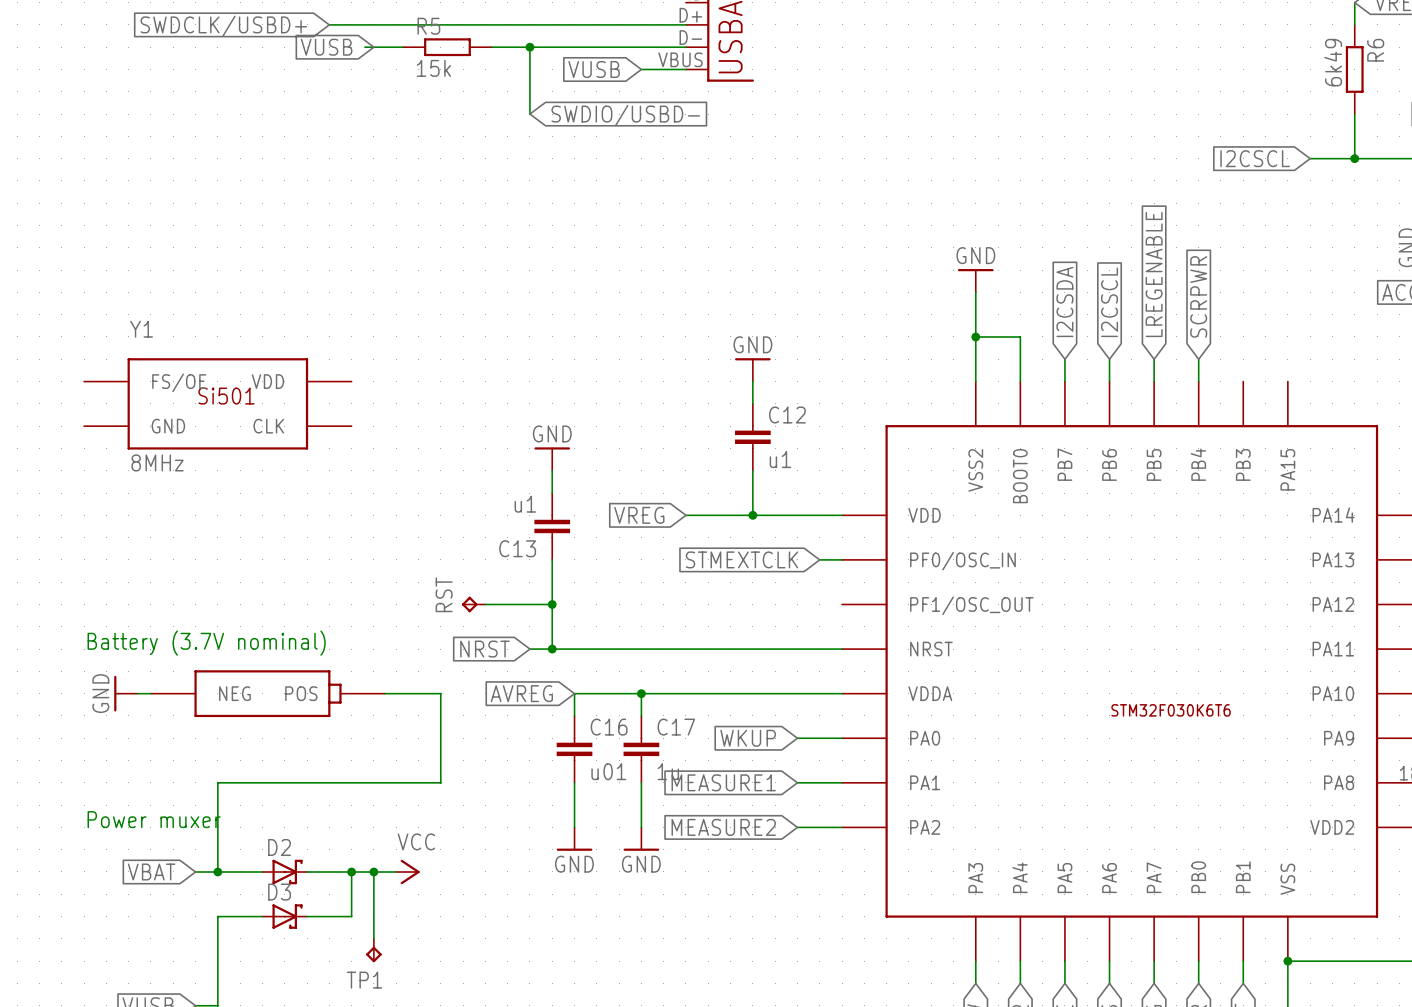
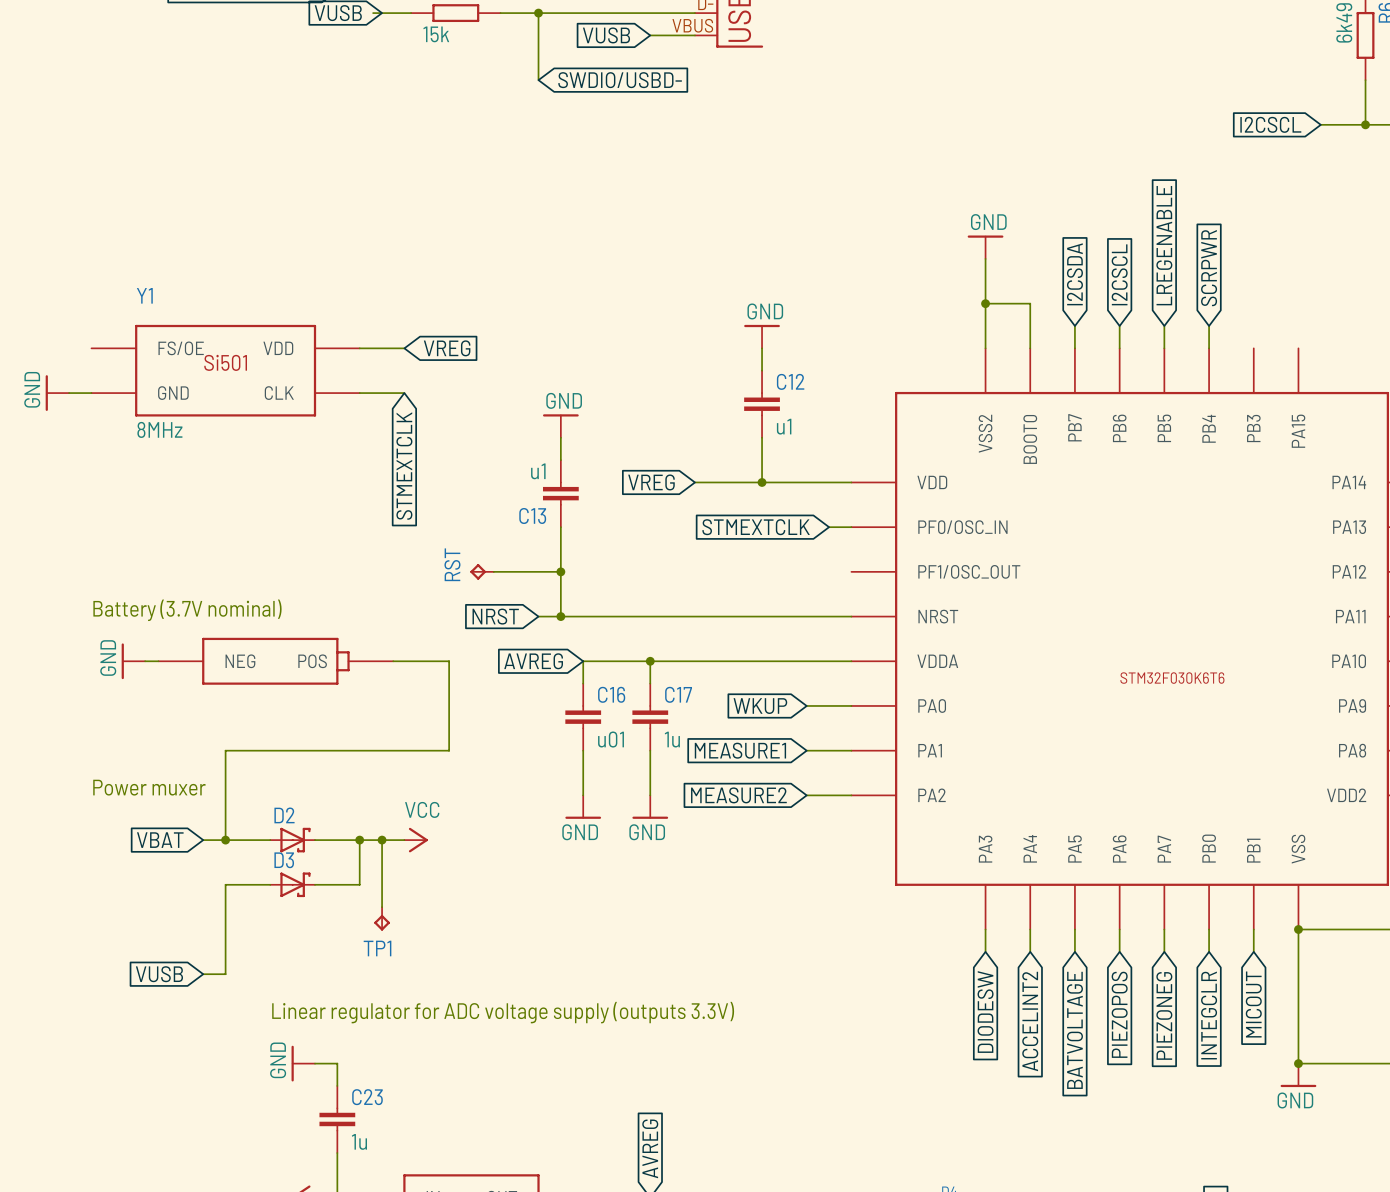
wire: none -> (359, 348) (404, 348)
global label: none -> VREG (447, 348)
power symbol: none -> GND (57, 393)
wire: none -> (69, 393) (91, 393)
wire: none -> (359, 393) (404, 393)
global label: none -> STMEXTCLK (404, 466)

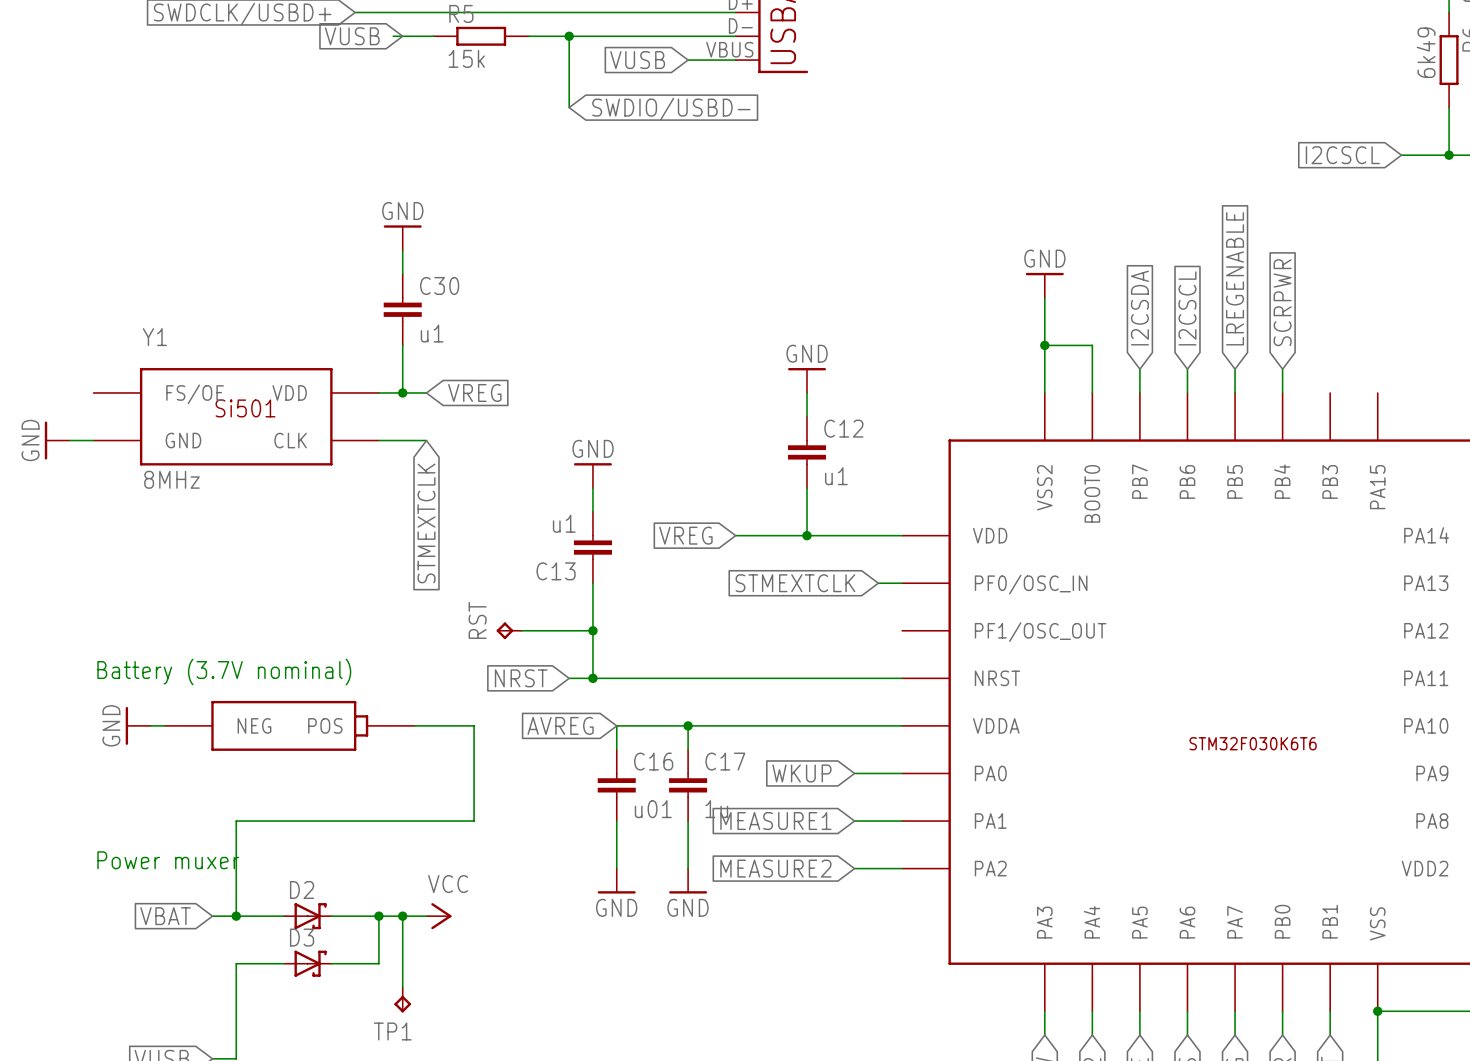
power symbol: none -> GND (402, 237)
wire: none -> (402, 250) (402, 274)
C30: none -> u1 (402, 309)
wire: none -> (402, 345) (402, 392)
junction: none -> (402, 392)

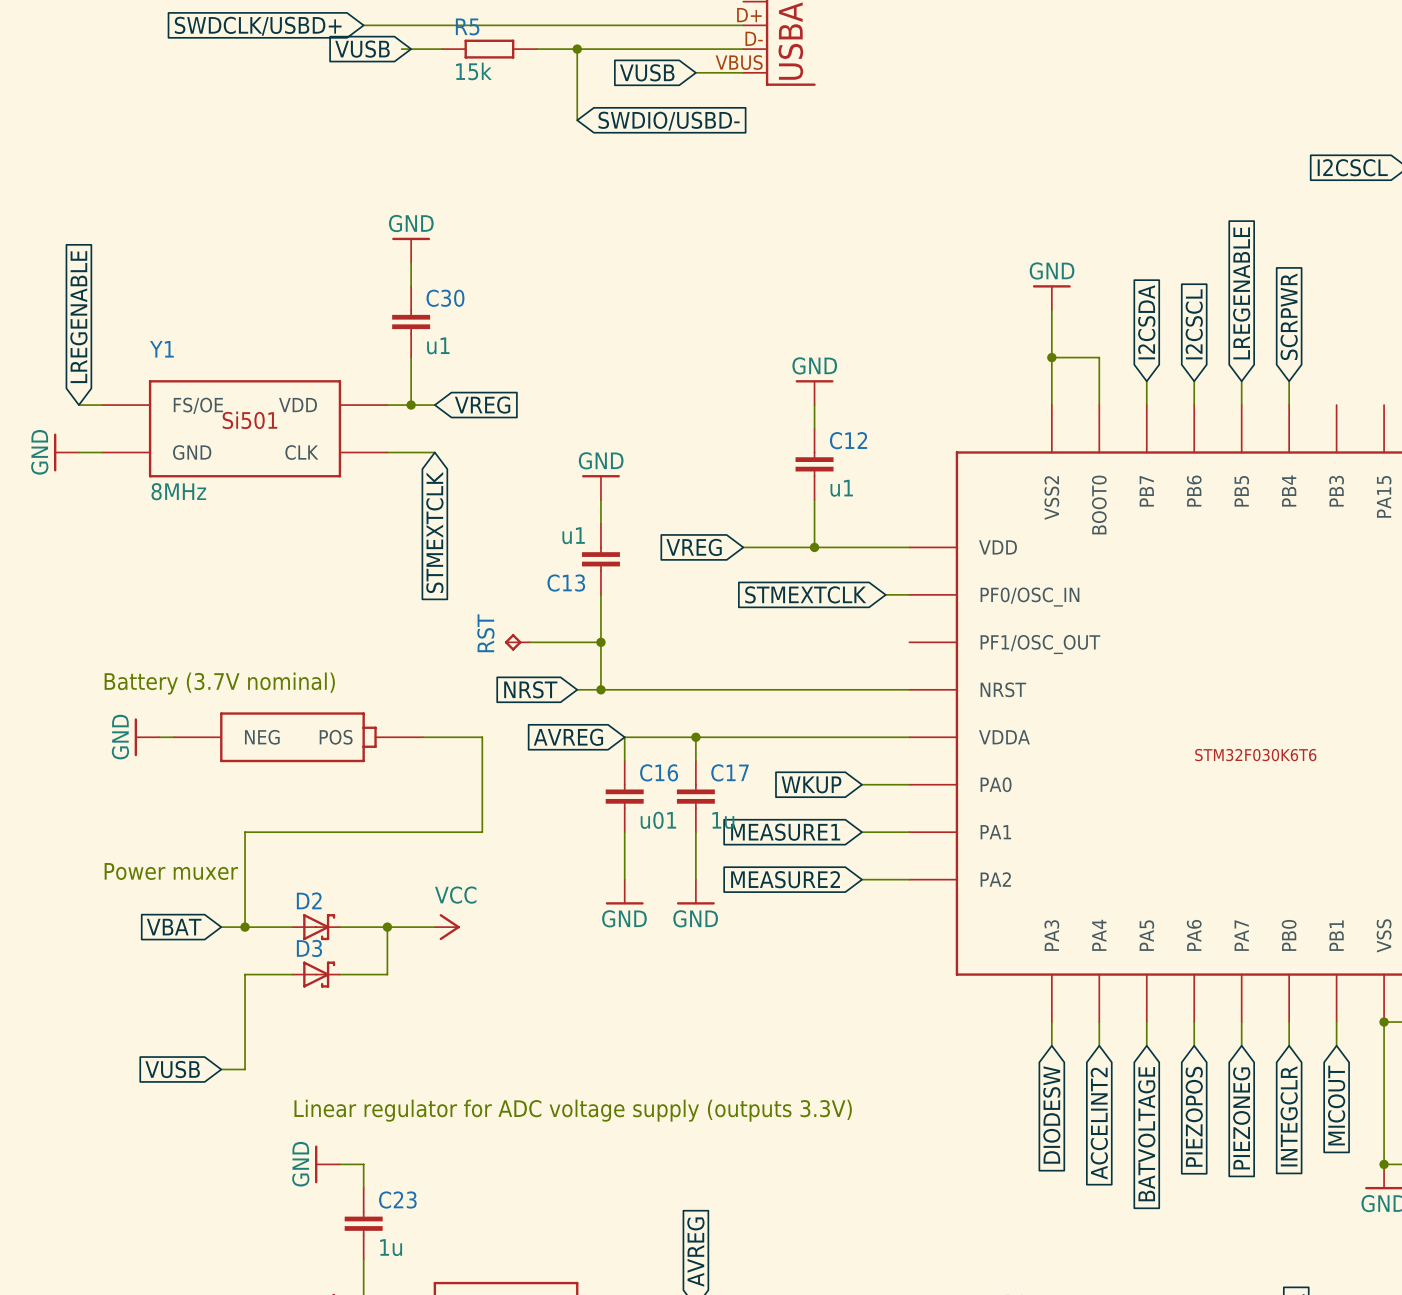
global label: none -> LREGENABLE (78, 317)
wire: none -> (78, 405) (102, 405)
wire: (402, 916) (402, 987) -> none
junction: (402, 916) -> none
TP1: (402, 999) -> none

